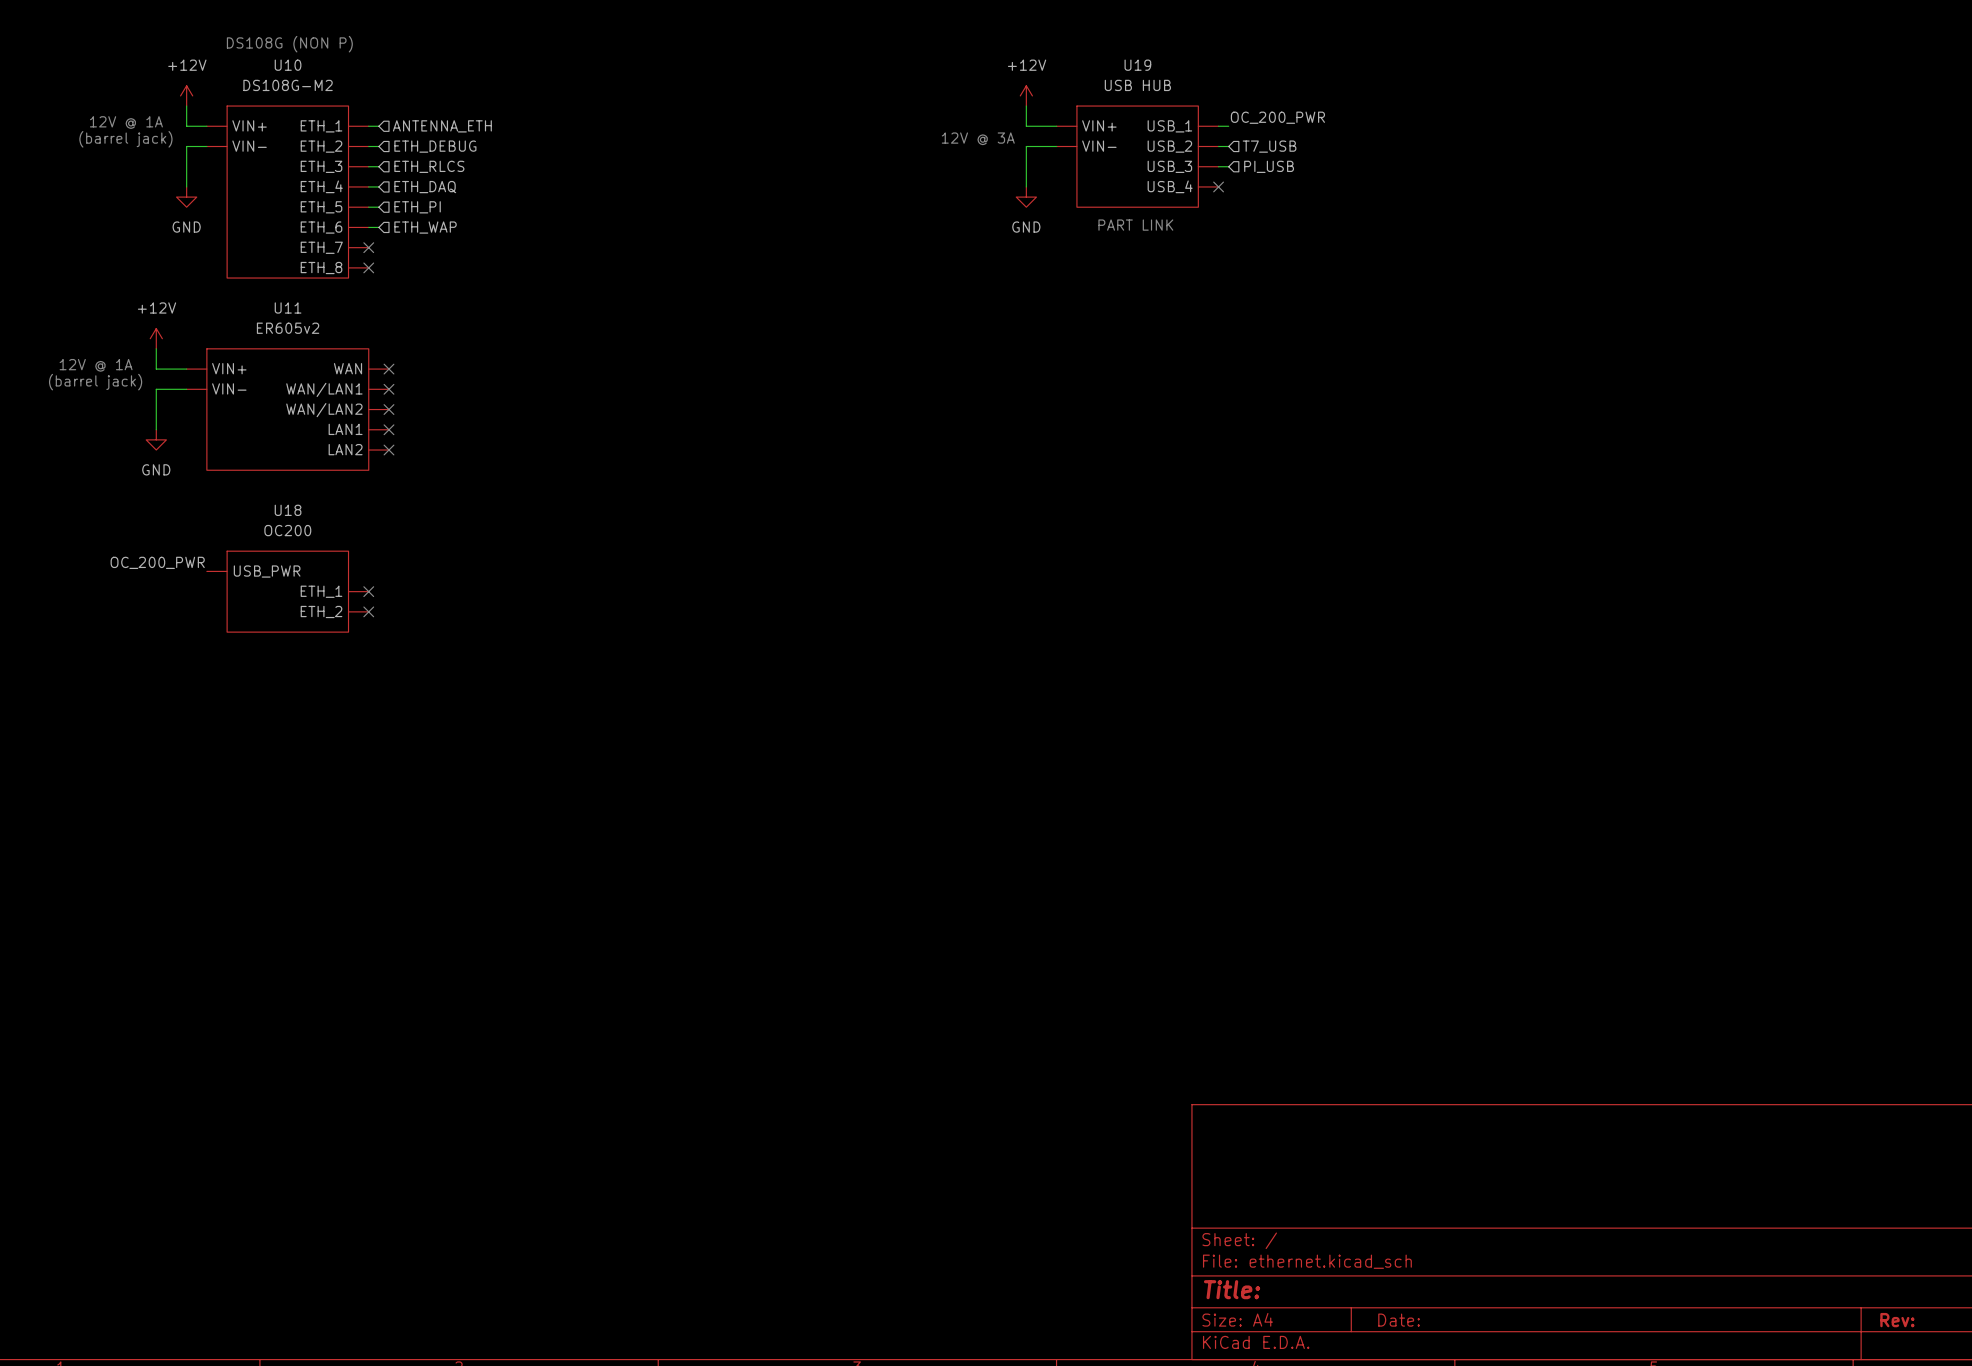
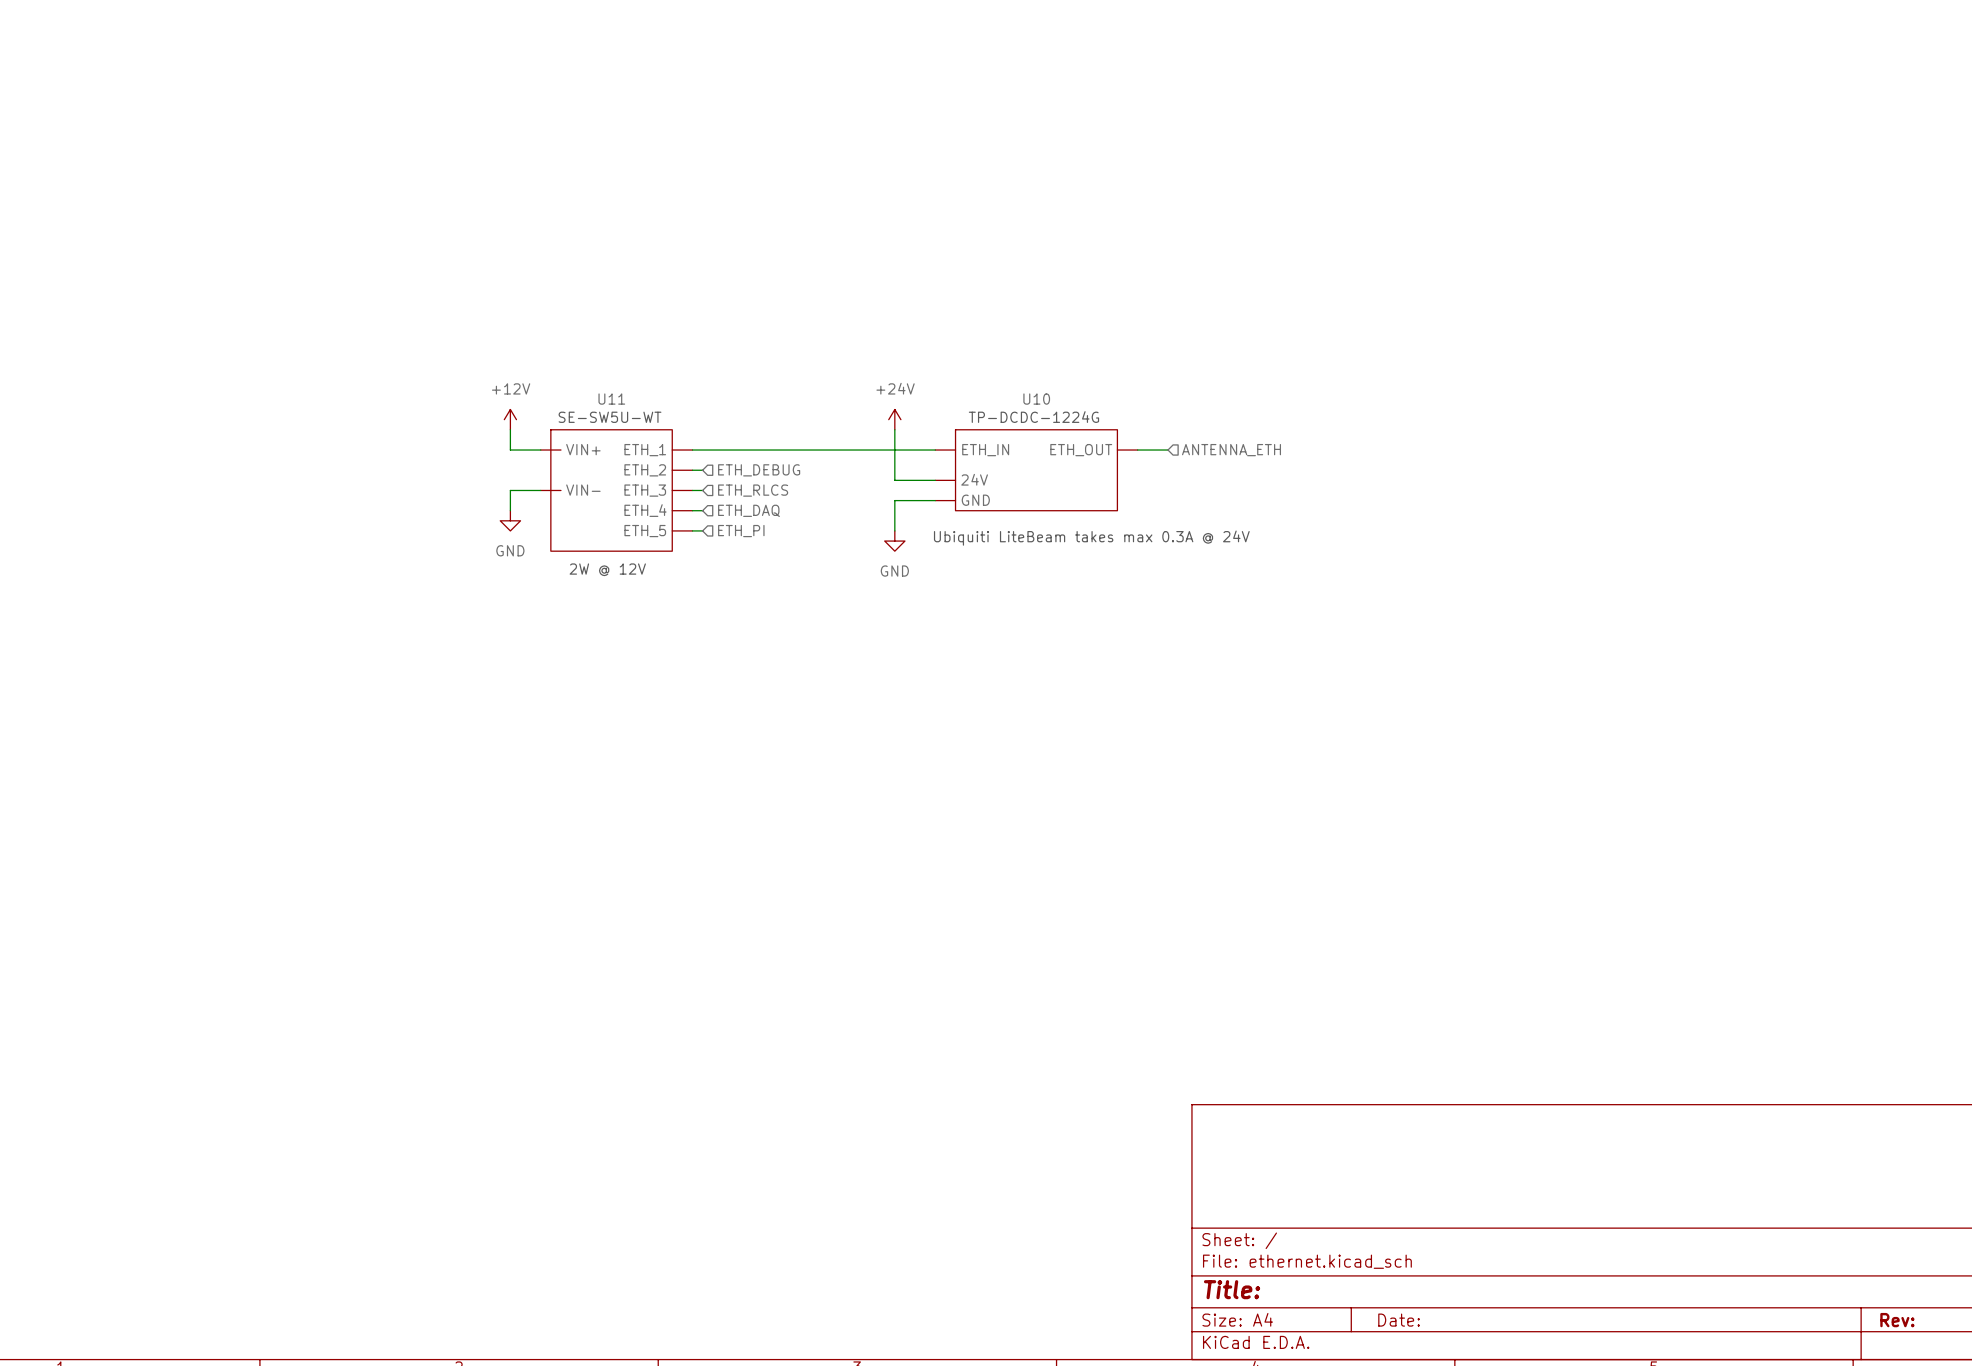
text: DS108G (NON P) (289, 44) -> none
U10 name position: U10 (288, 65) -> U10 (1036, 399)
U10 value: DS108G-M2 (288, 85) -> none
power symbol: +12V (186, 95) -> none
power symbol: +12V (1026, 95) -> none
wire: (186, 106) (186, 126) (206, 126) -> none
U10 symbol: [206, 106, 369, 279] -> [935, 429, 1138, 511]
wire: (1026, 106) (1026, 126) (1056, 126) -> none
label: OC_200_PWR (1277, 117) -> none
text: 12V @ 1A (126, 122) -> none
wire: (368, 126) (378, 126) -> none
hierarchical label: ANTENNA_ETH (442, 126) -> none
wire: (1218, 126) (1228, 126) -> none
text: 12V @ 3A (978, 138) -> none
text: (barrel jack) (125, 139) -> none
wire: (206, 146) (186, 146) (186, 186) -> none
wire: (368, 146) (378, 146) -> none
hierarchical label: ETH_DEBUG (435, 146) -> none
wire: (1056, 146) (1026, 146) (1026, 186) -> none
wire: (1218, 146) (1228, 146) -> none
hierarchical label: T7_USB (1269, 146) -> none
U19: USB HUB (1137, 156) -> none
wire: (368, 166) (378, 166) -> none
hierarchical label: ETH_RLCS (429, 166) -> none
wire: (1218, 166) (1228, 166) -> none
hierarchical label: PI_USB (1269, 166) -> none
wire: (368, 186) (378, 186) -> none
no-connect mark: (1218, 186) -> none
hierarchical label: ETH_DAQ (425, 187) -> none
power symbol: GND (186, 197) -> none
power symbol: GND (1026, 197) -> none
wire: (368, 207) (378, 207) -> none
hierarchical label: ETH_PI (417, 207) -> none
text: PART LINK (1135, 225) -> none
wire: (368, 227) (378, 227) -> none
hierarchical label: ETH_WAP (425, 227) -> none
no-connect mark: (368, 247) -> none
no-connect mark: (368, 267) -> none
U11 value: ER605v2 (288, 328) -> none
power symbol: +12V (156, 338) -> none
wire: (156, 348) (156, 369) (186, 369) -> none
U11 symbol: [186, 348, 389, 471] -> [540, 429, 693, 552]
text: 12V @ 1A (96, 365) -> none
no-connect mark: (388, 369) -> none
text: (barrel jack) (95, 382) -> none
wire: (186, 389) (156, 389) (156, 429) -> none
no-connect mark: (388, 389) -> none
no-connect mark: (388, 409) -> none
text: none -> SE-SW5U-WT (610, 417)
text: none -> TP-DCDC-1224G (1033, 417)
power symbol: none -> +12V (510, 419)
power symbol: none -> +24V (894, 419)
no-connect mark: (388, 429) -> none
wire: none -> (510, 429) (510, 450) (540, 450)
wire: none -> (894, 429) (894, 480) (935, 480)
power symbol: GND (156, 439) -> none
no-connect mark: (388, 450) -> none
wire: none -> (692, 450) (935, 450)
wire: none -> (1137, 450) (1167, 450)
hierarchical label: none -> ANTENNA_ETH (1231, 450)
wire: none -> (692, 470) (702, 470)
hierarchical label: none -> ETH_DEBUG (759, 470)
wire: none -> (540, 490) (510, 490) (510, 510)
wire: none -> (692, 490) (702, 490)
hierarchical label: none -> ETH_RLCS (753, 490)
wire: none -> (935, 500) (894, 500) (894, 530)
wire: none -> (692, 510) (702, 510)
hierarchical label: none -> ETH_DAQ (749, 510)
power symbol: none -> GND (510, 520)
wire: none -> (692, 530) (702, 530)
hierarchical label: none -> ETH_PI (741, 531)
text: none -> Ubiquiti LiteBeam takes max 0.3A @ 24V (1091, 538)
power symbol: none -> GND (894, 541)
label: OC_200_PWR (157, 562) -> none
text: none -> 2W @ 12V (607, 569)
U18: OC200 (287, 591) -> none
no-connect mark: (368, 591) -> none
no-connect mark: (368, 611) -> none

